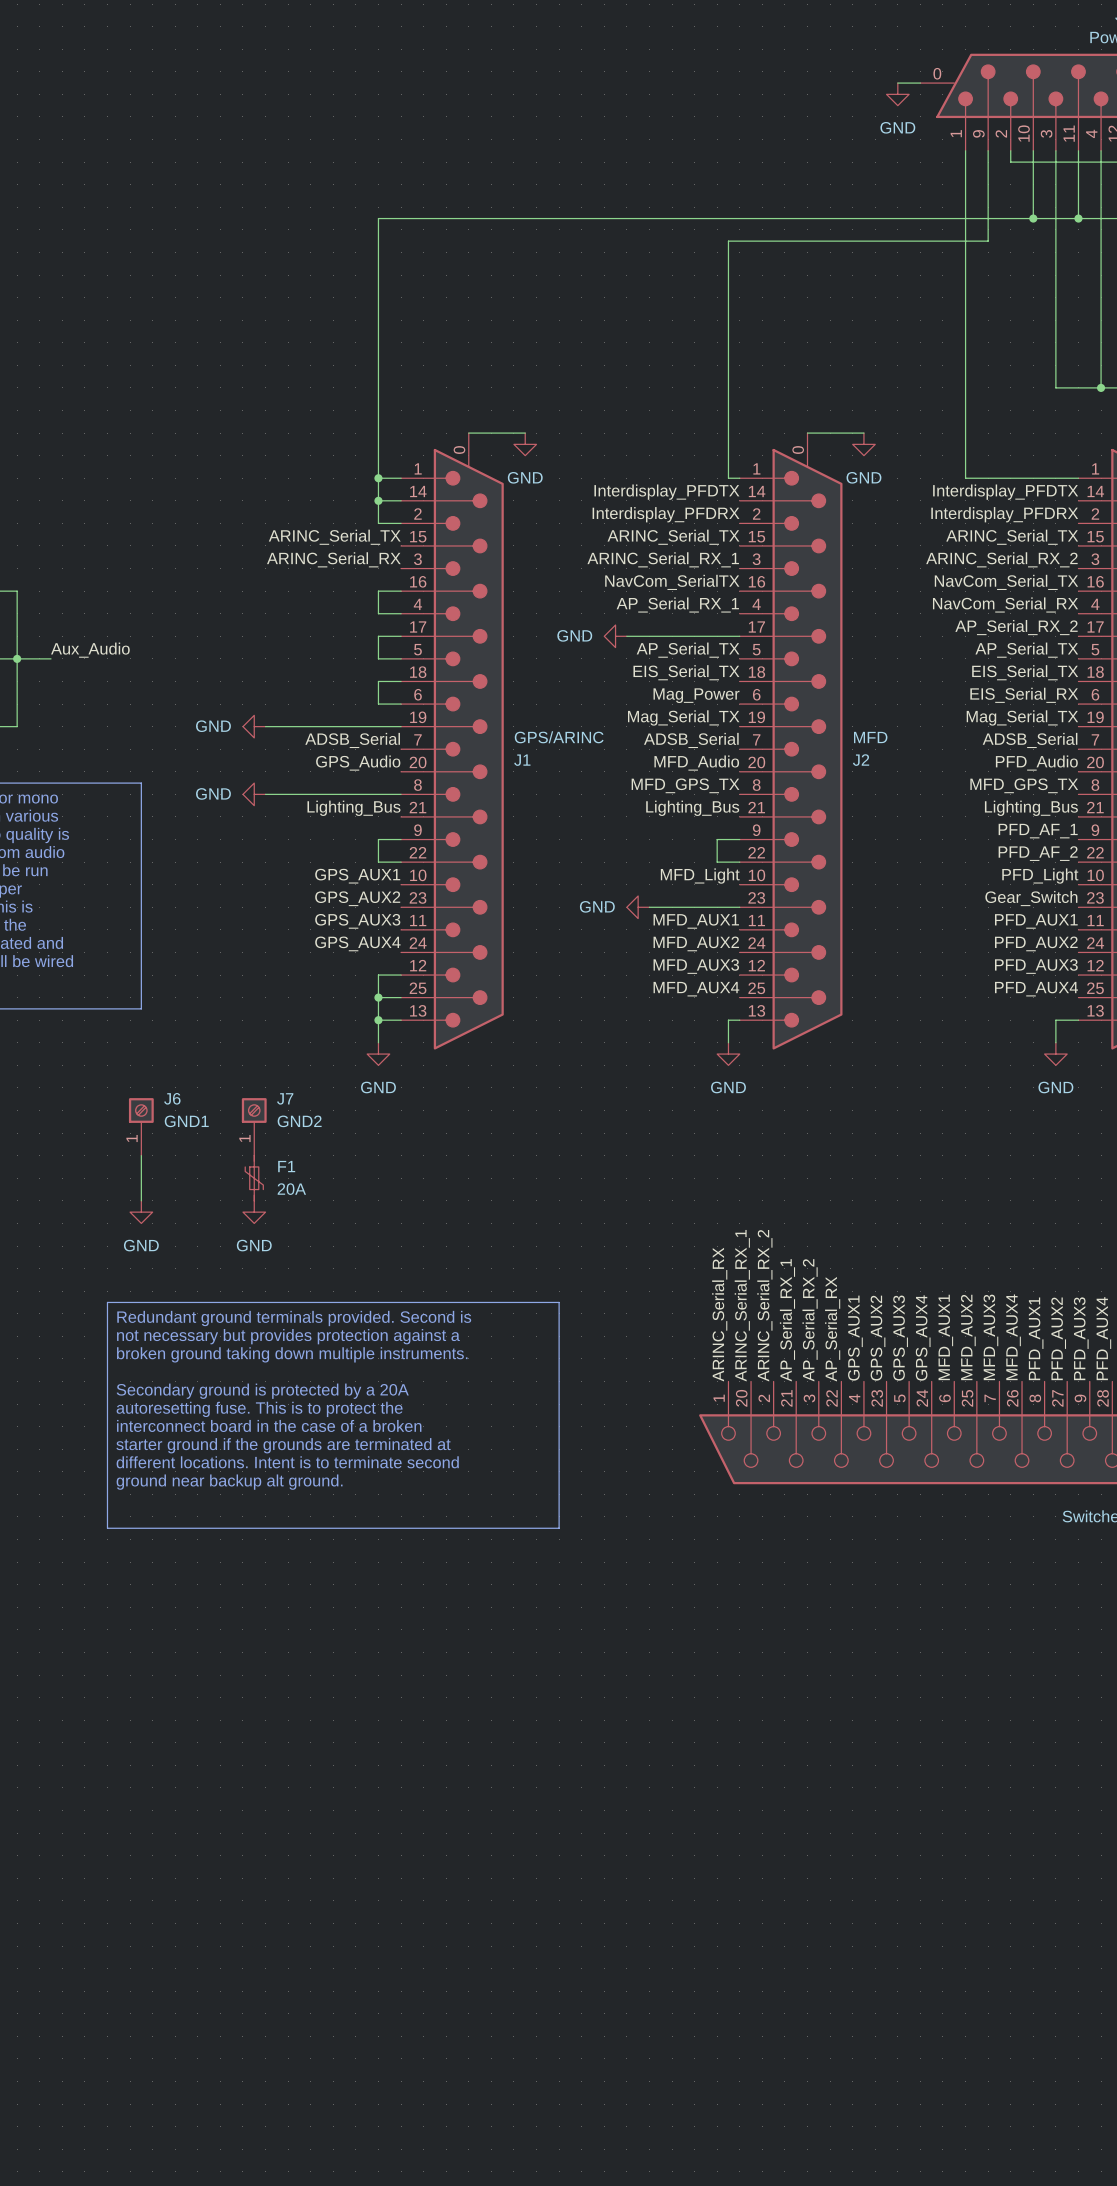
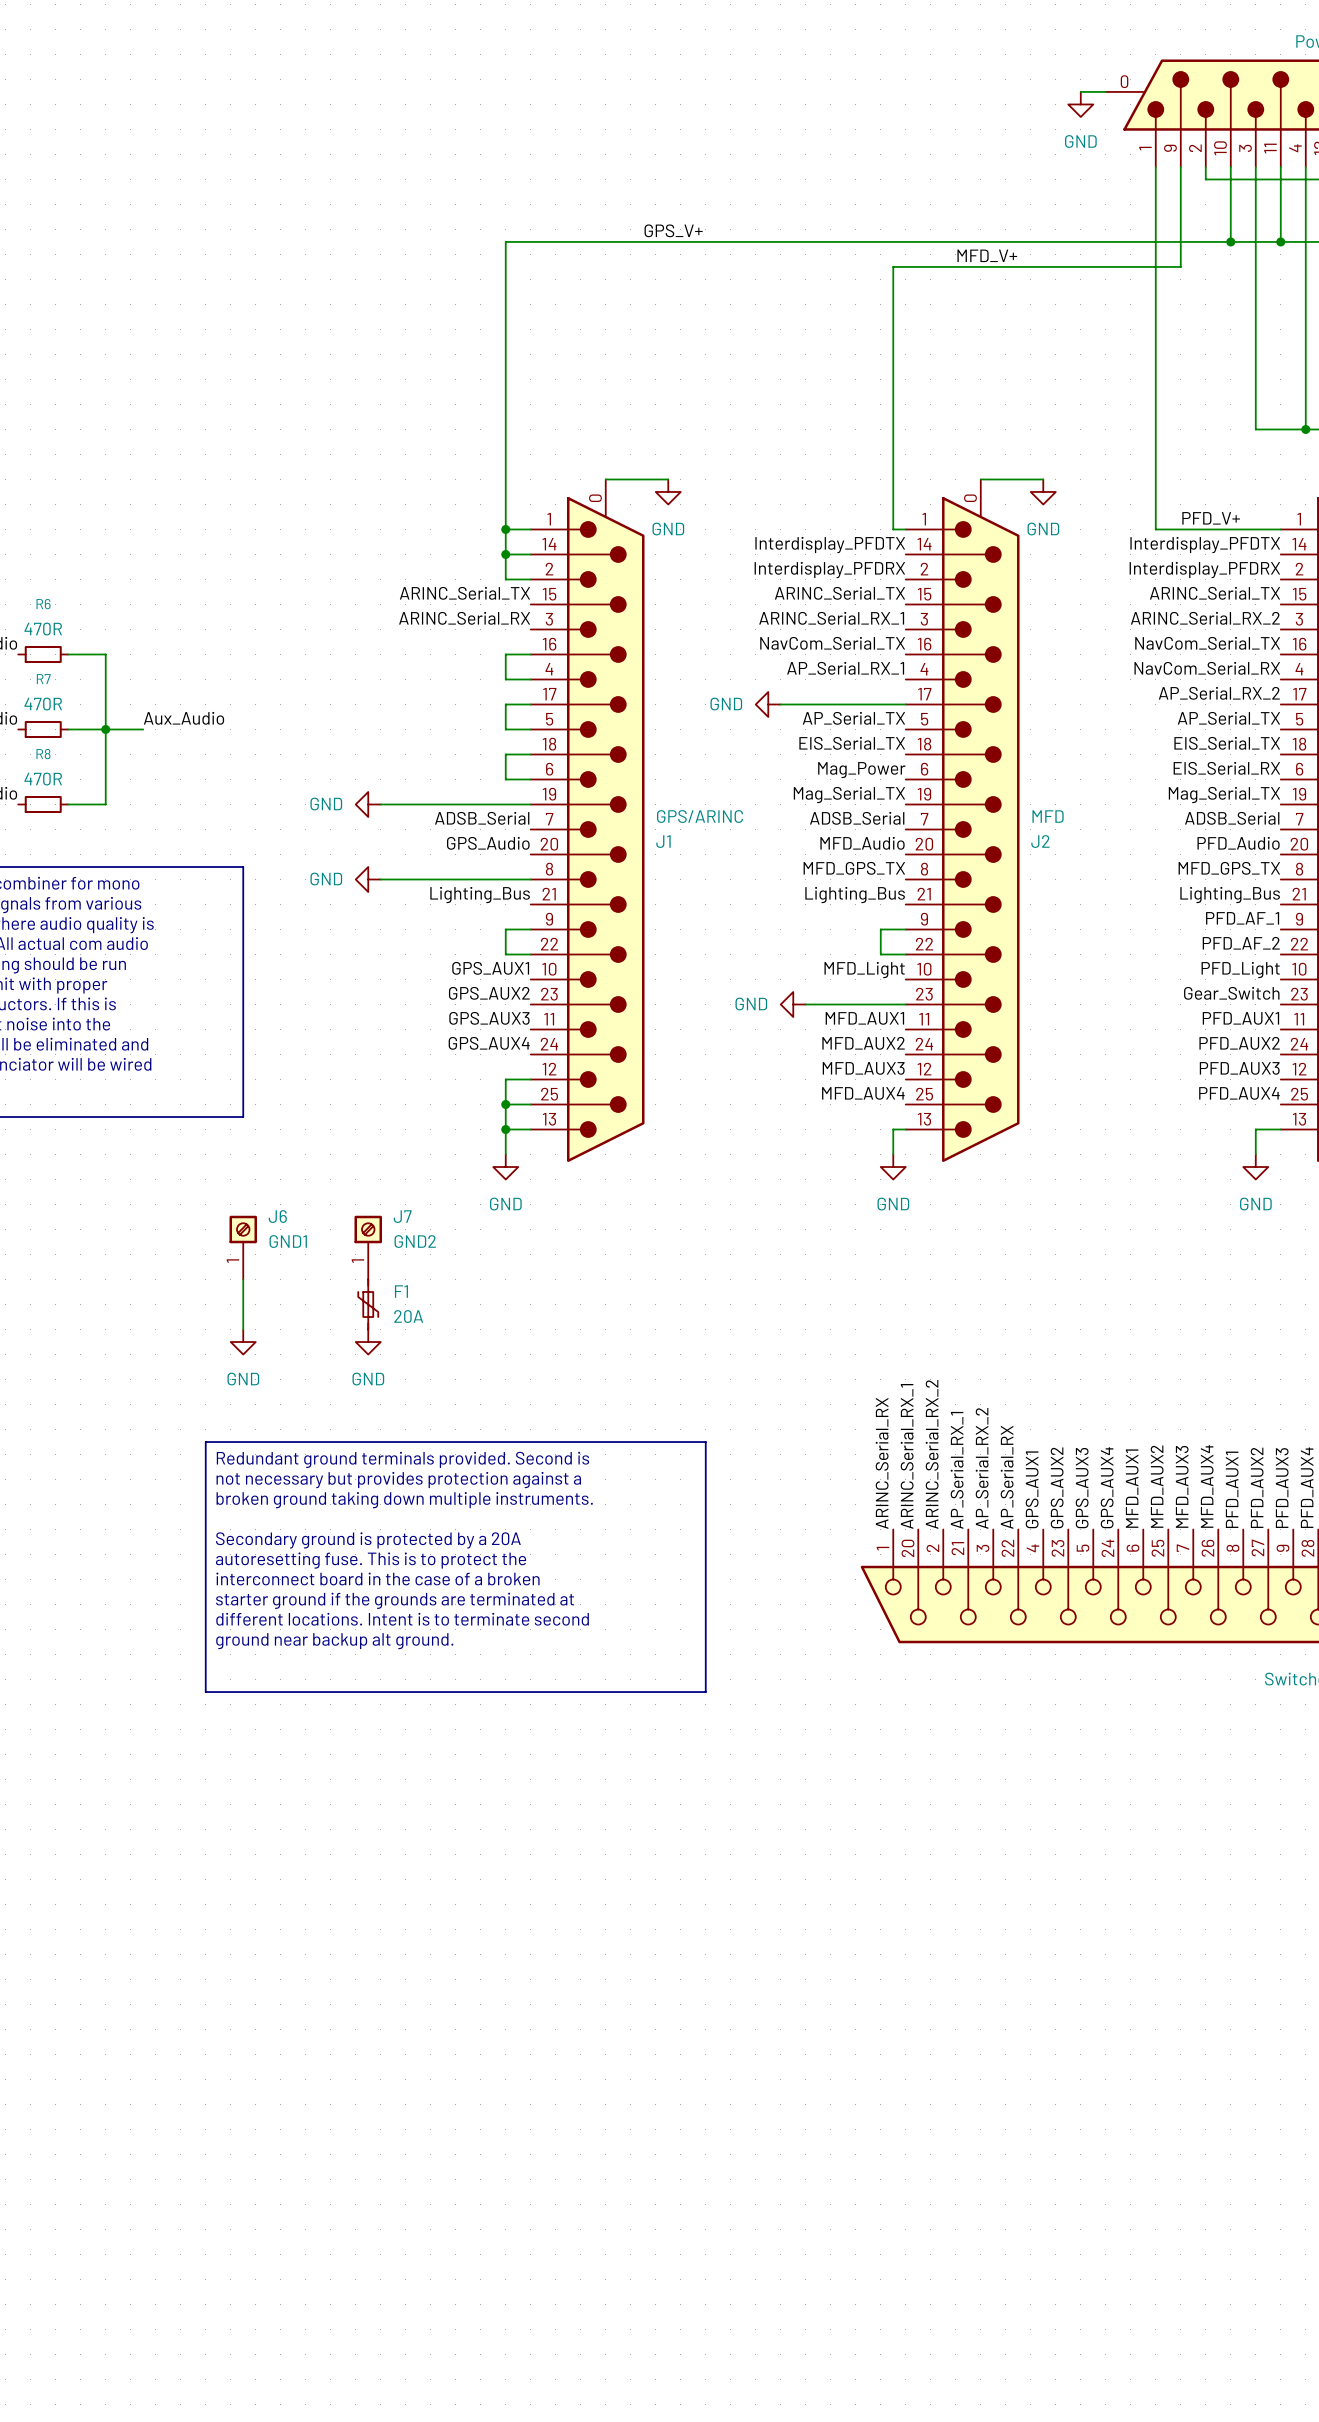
label: none -> GPS_V+ (673, 230)
label: none -> MFD_V+ (987, 255)
label: none -> PFD_V+ (1211, 518)
label: NavCom_SerialTX (672, 582) -> NavCom_Serial_TX (832, 643)

